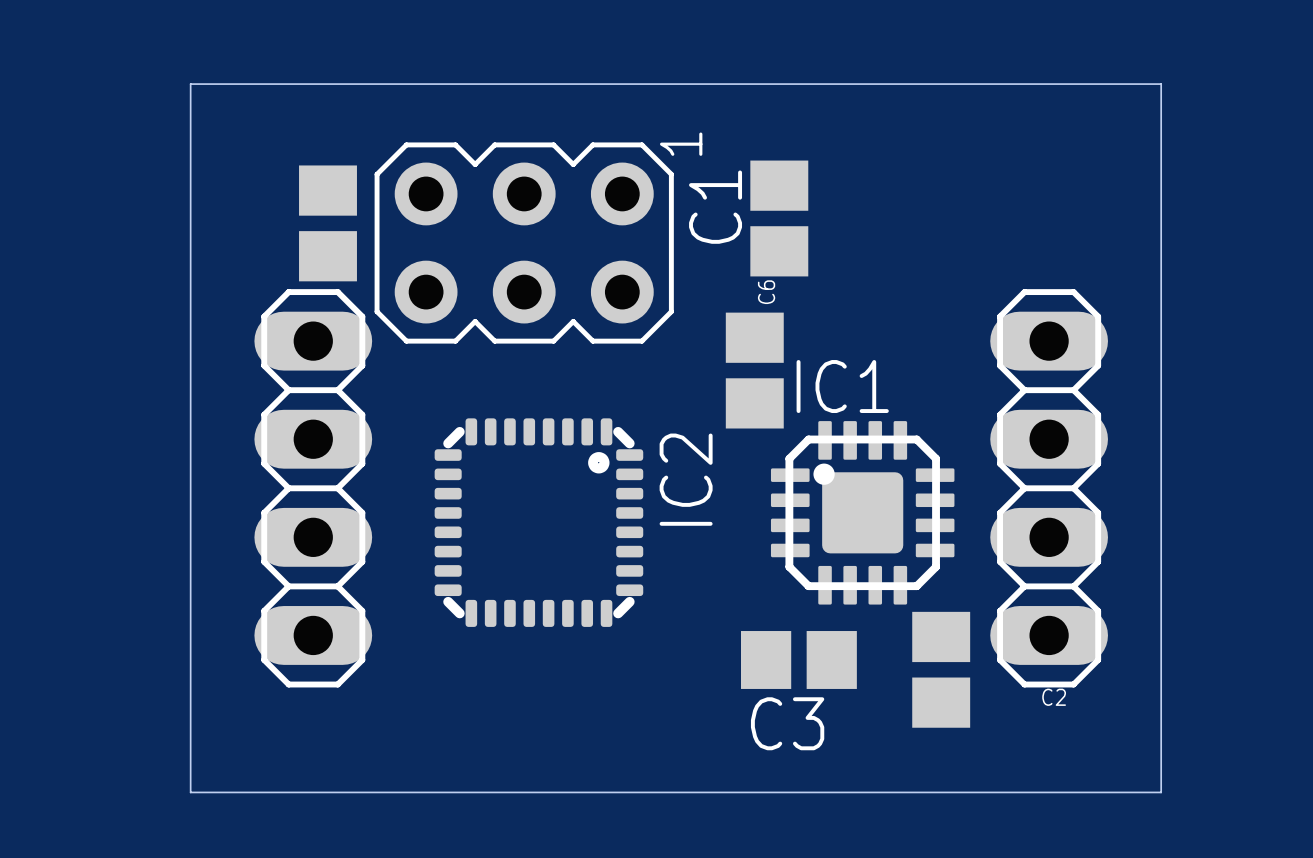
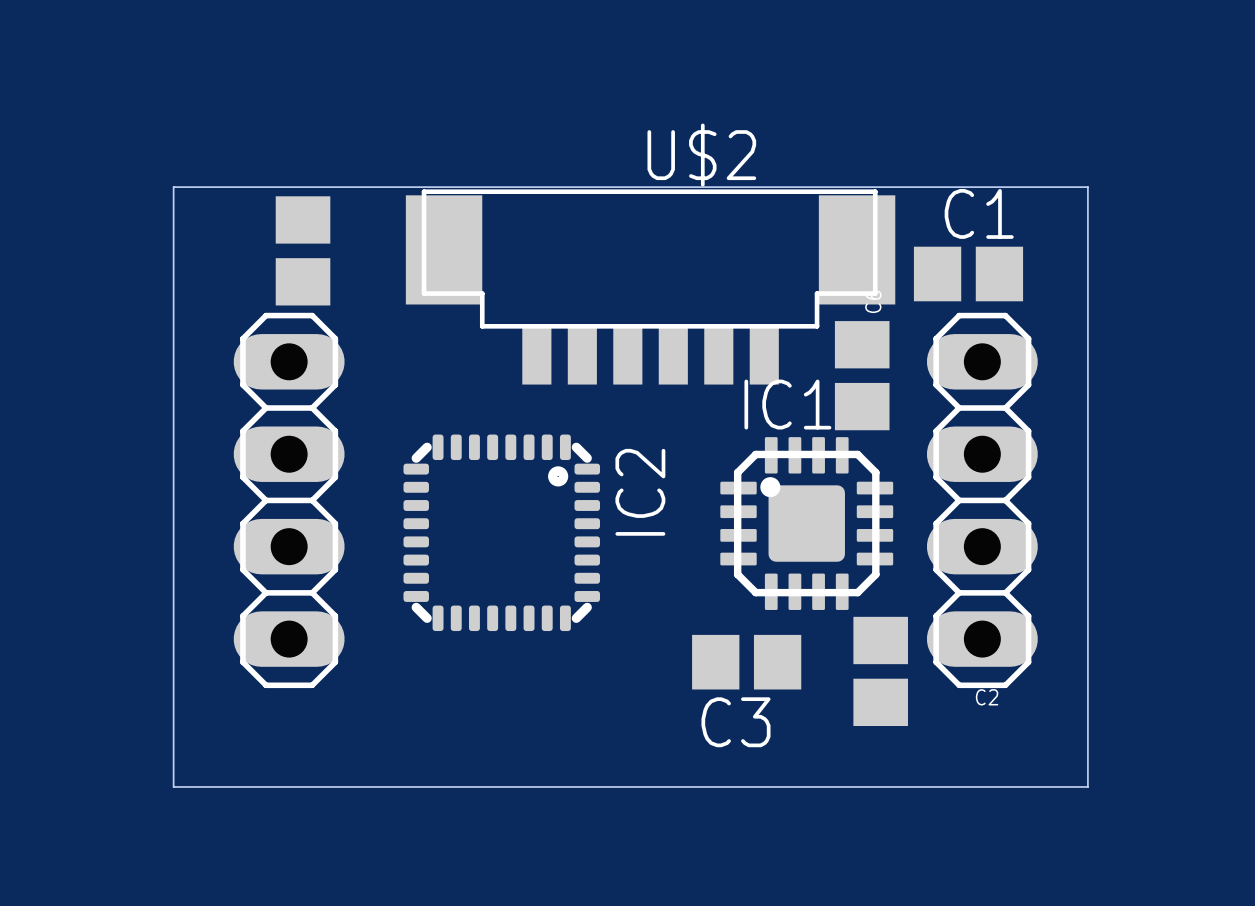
board edge: (190, 155) (190, 84) (1161, 84) (1161, 155) -> (173, 187) (1087, 187)
C1 rotation: 0° (779, 218) -> 90° clockwise (968, 273)
C1 position: (779, 218) -> (968, 273)
part: (524, 243) -> none
U$2: none -> (650, 286)
C6 position: (754, 370) -> (862, 375)

